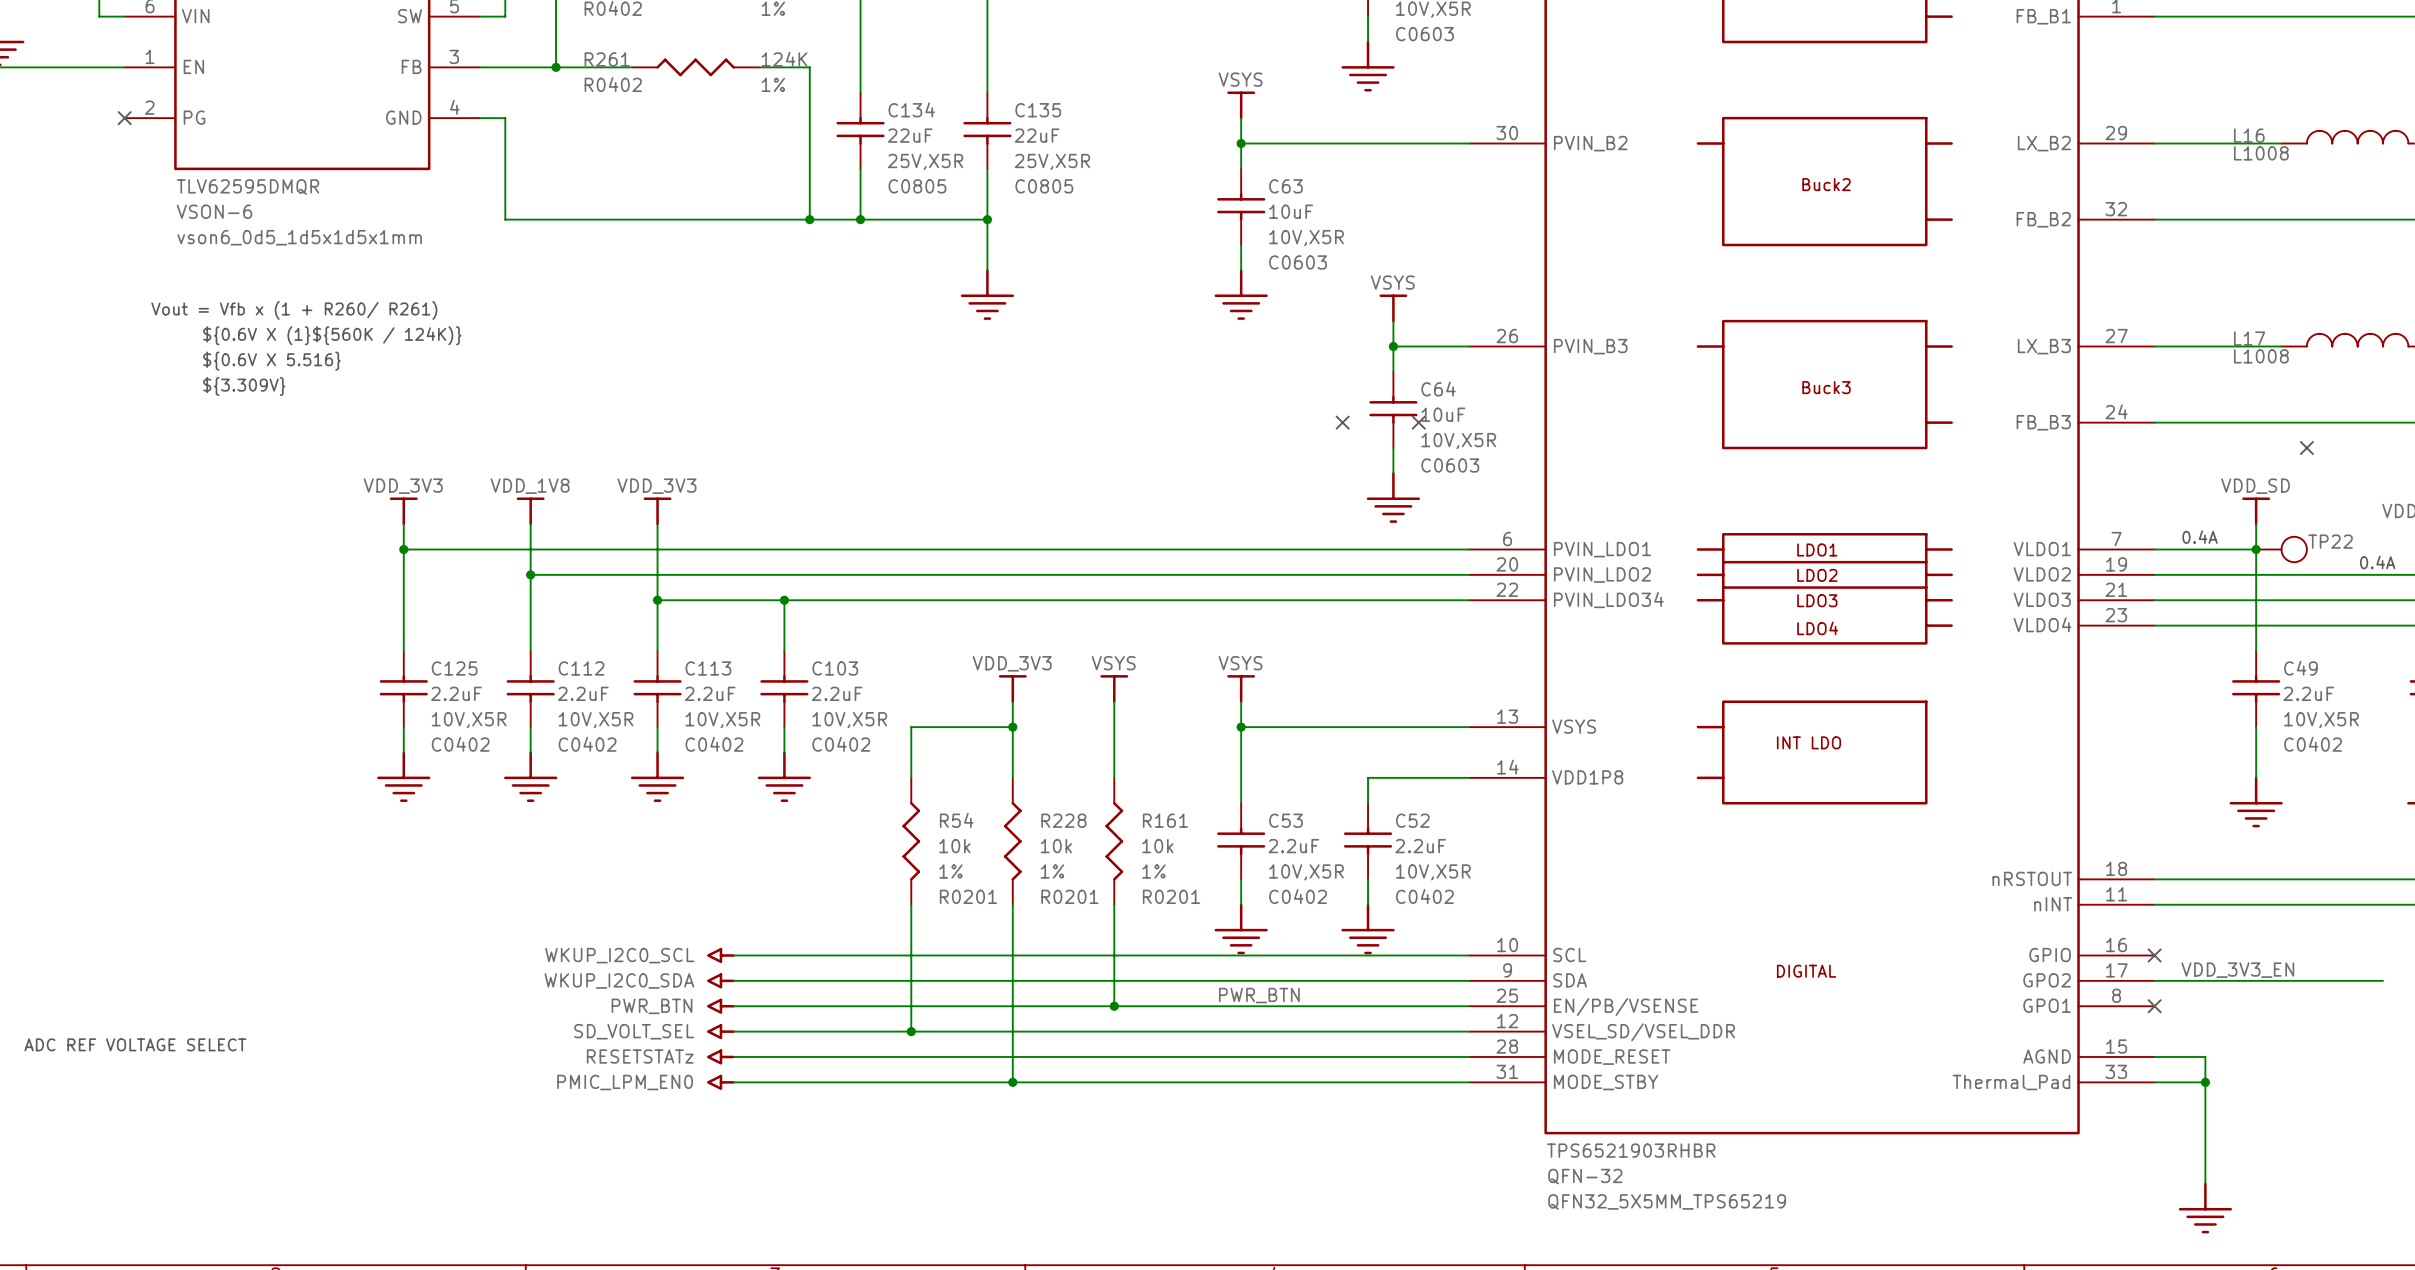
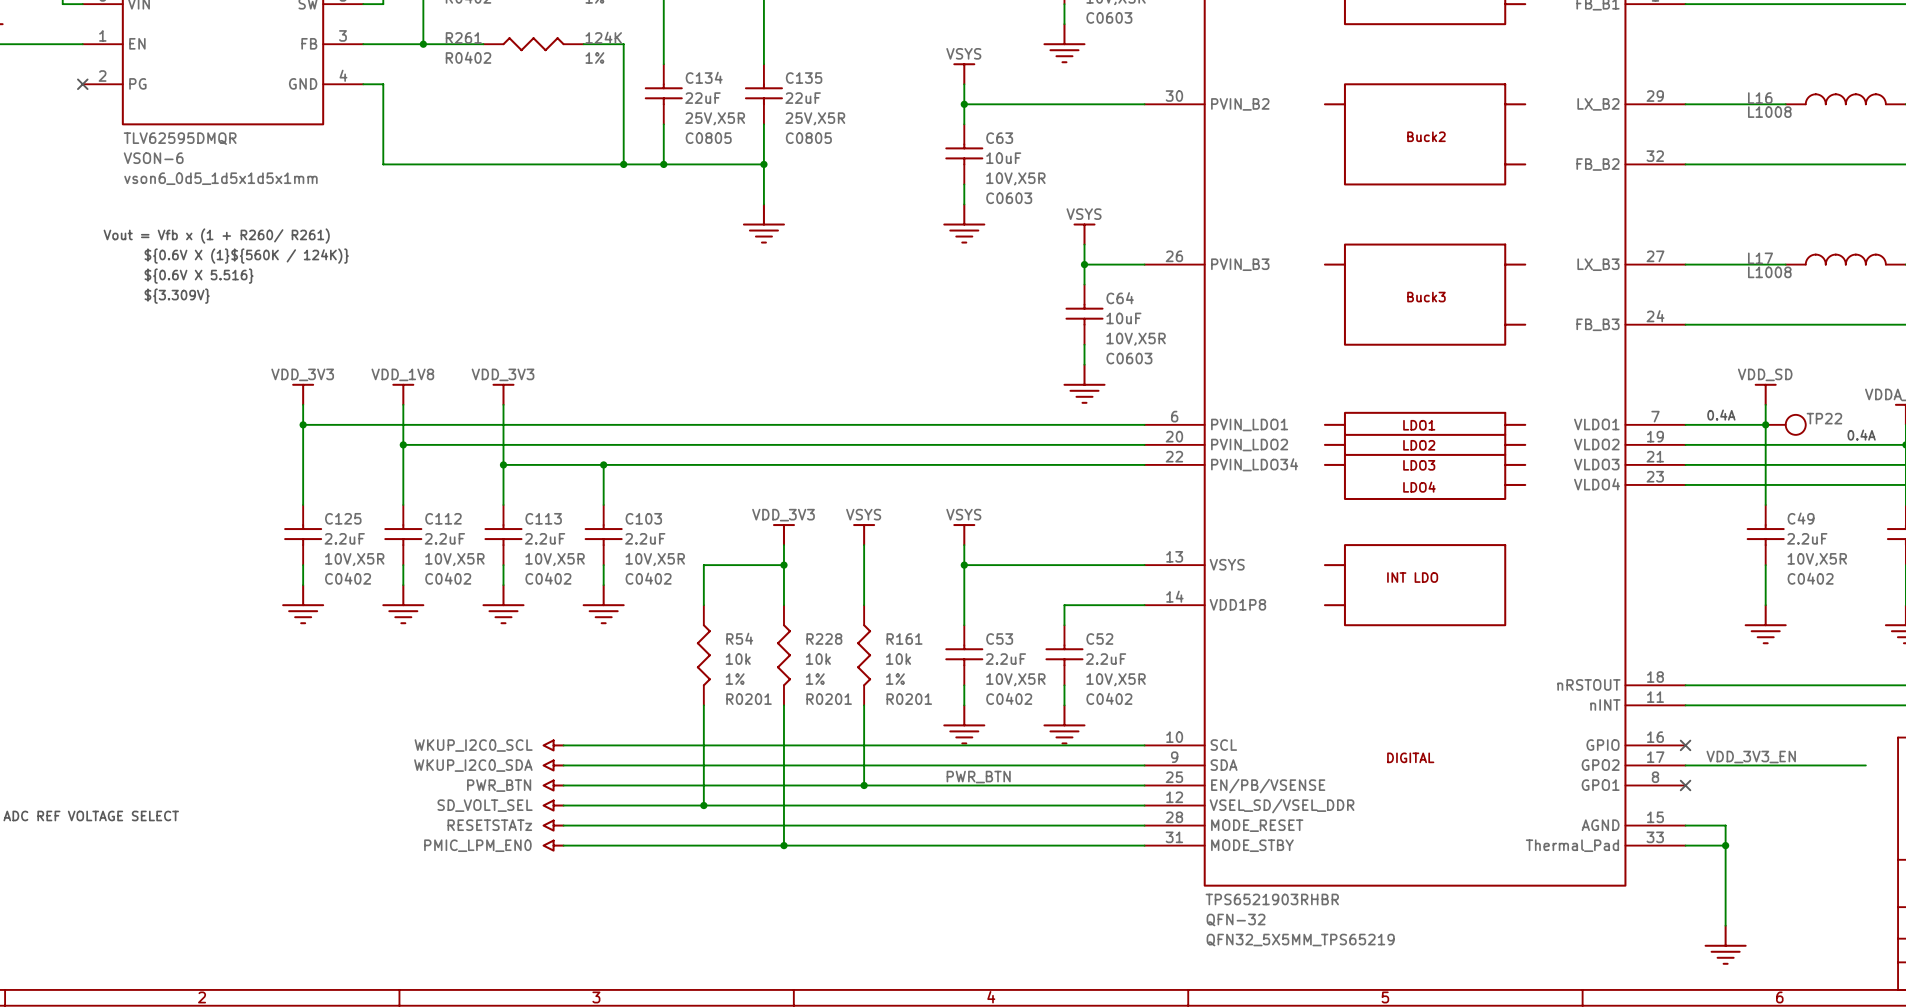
no-connect mark: (1342, 422) -> none
no-connect mark: (1418, 422) -> none
no-connect mark: (2306, 447) -> none

